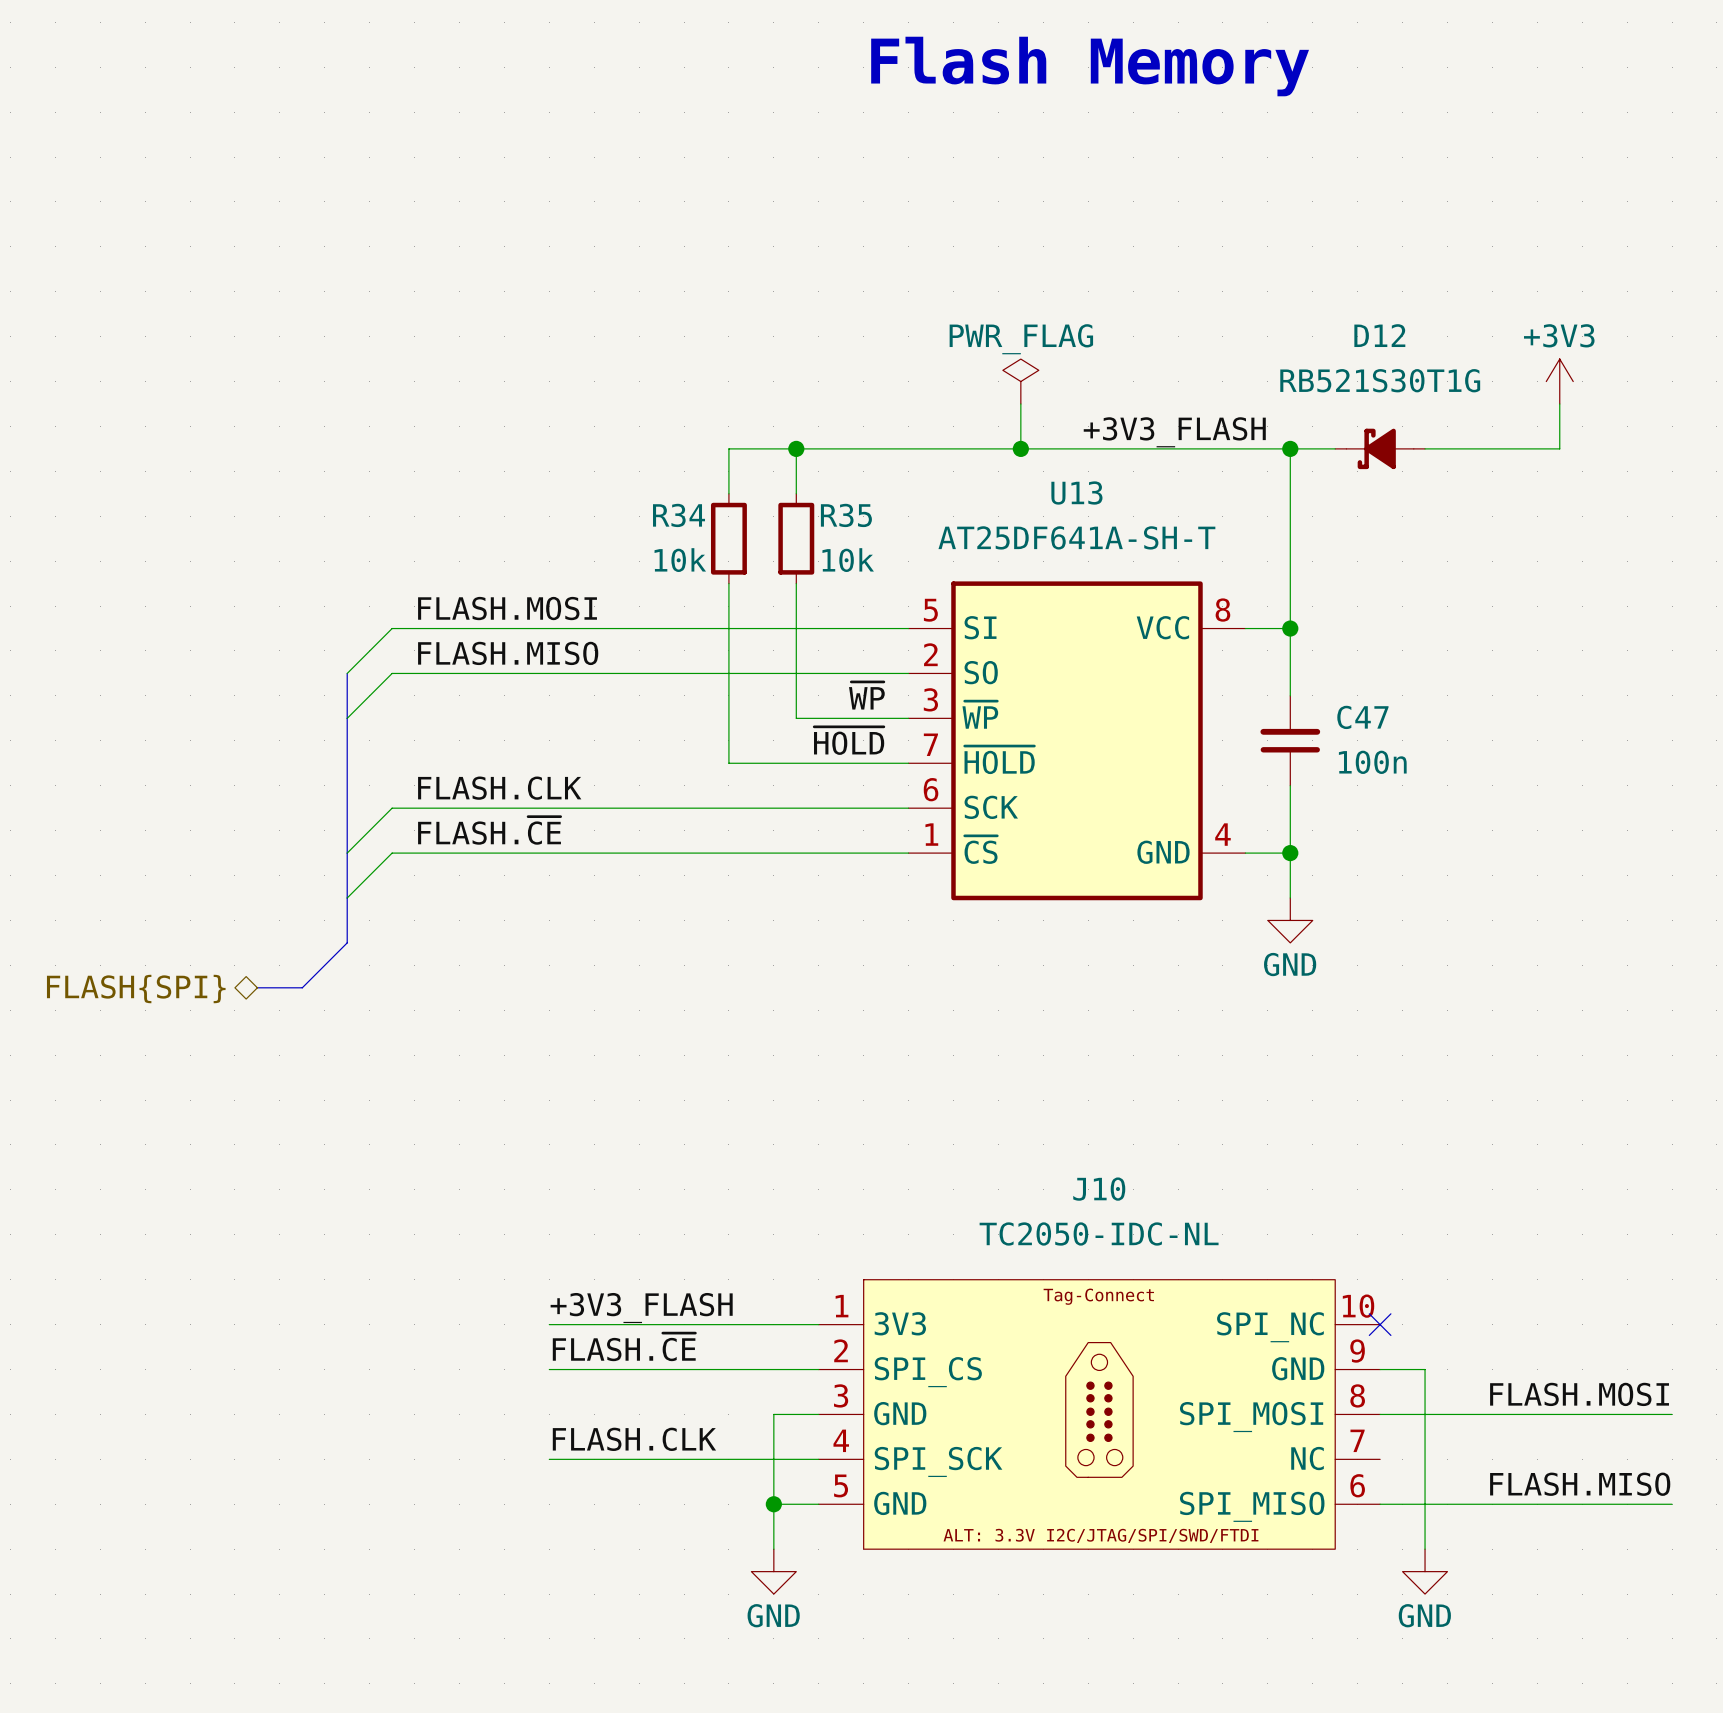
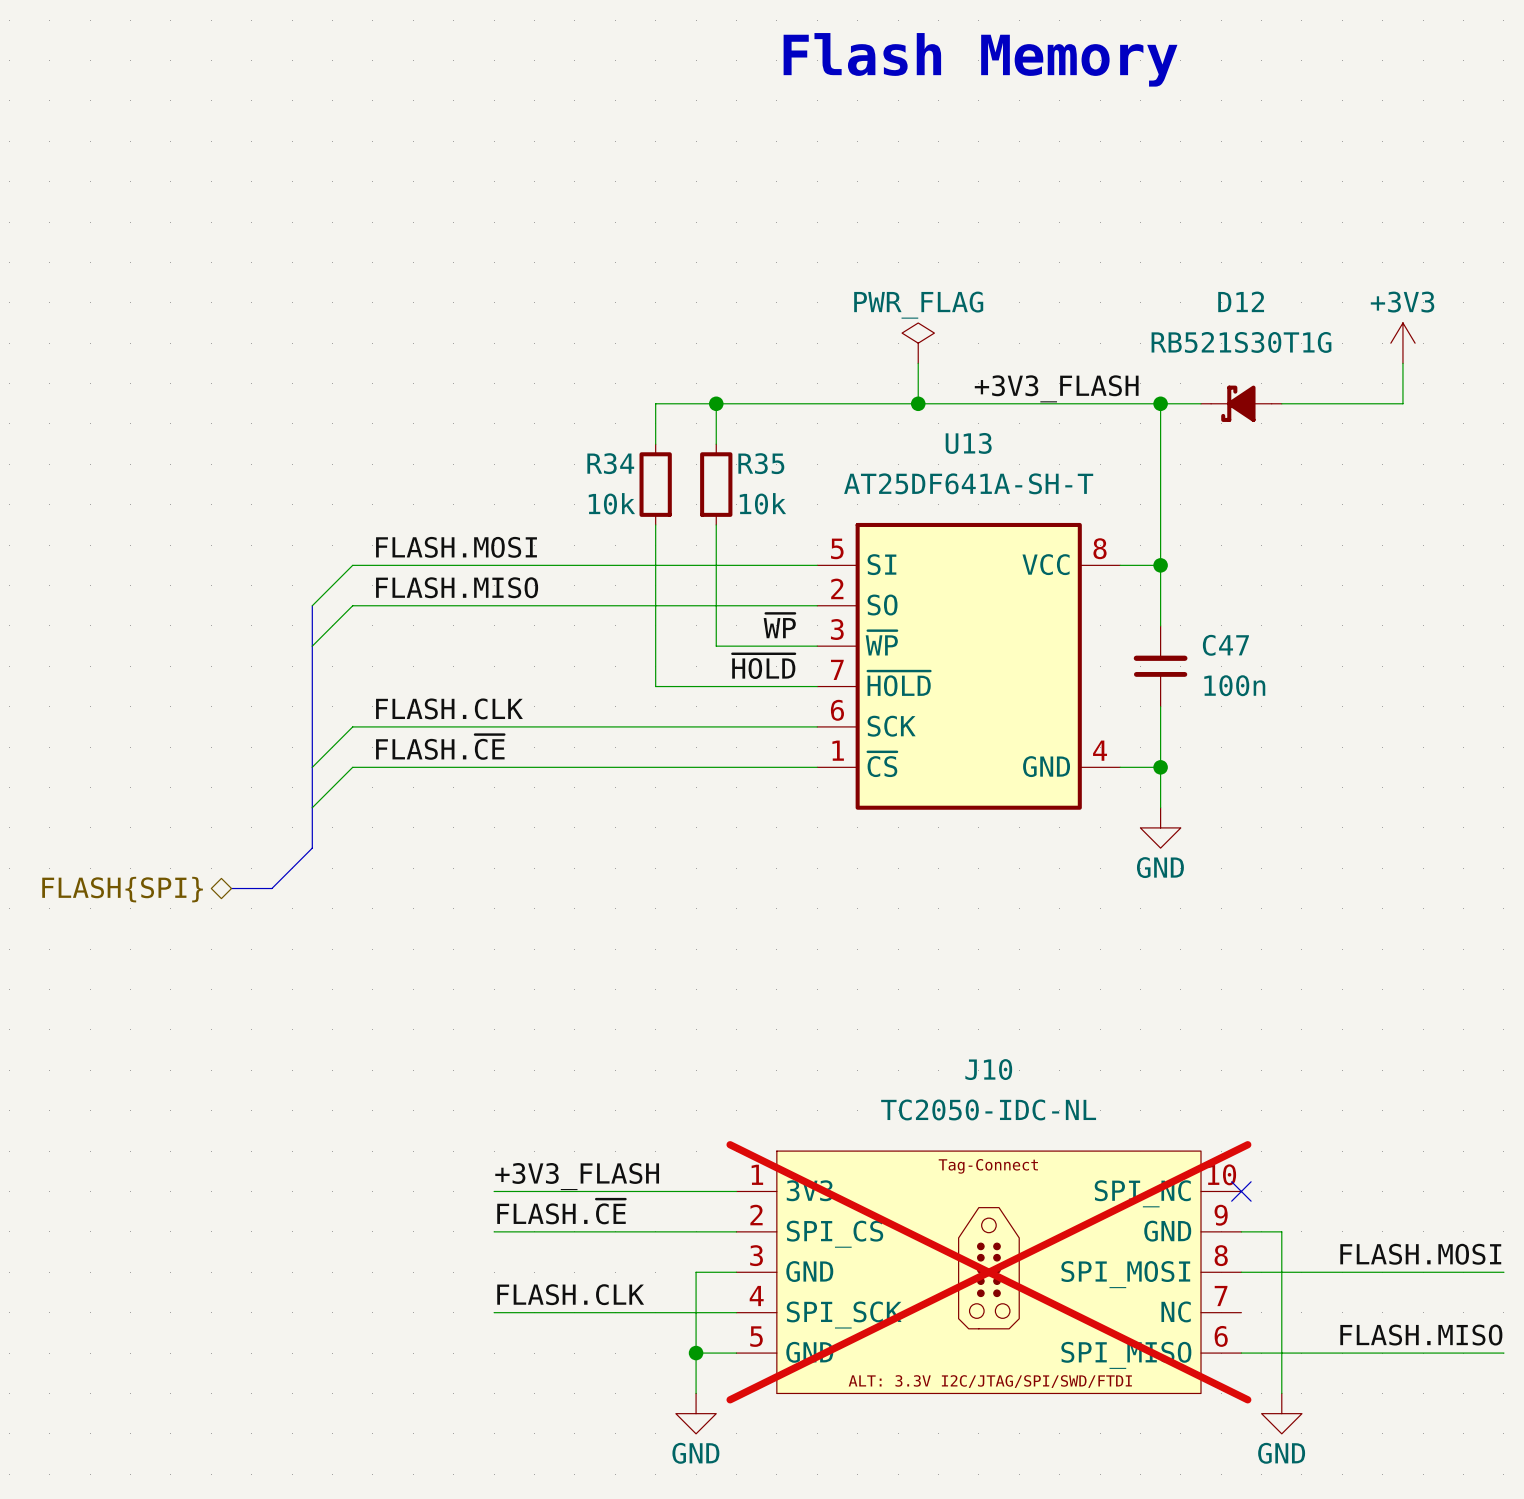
J10 do-not-place cross: none -> (988, 1272)

